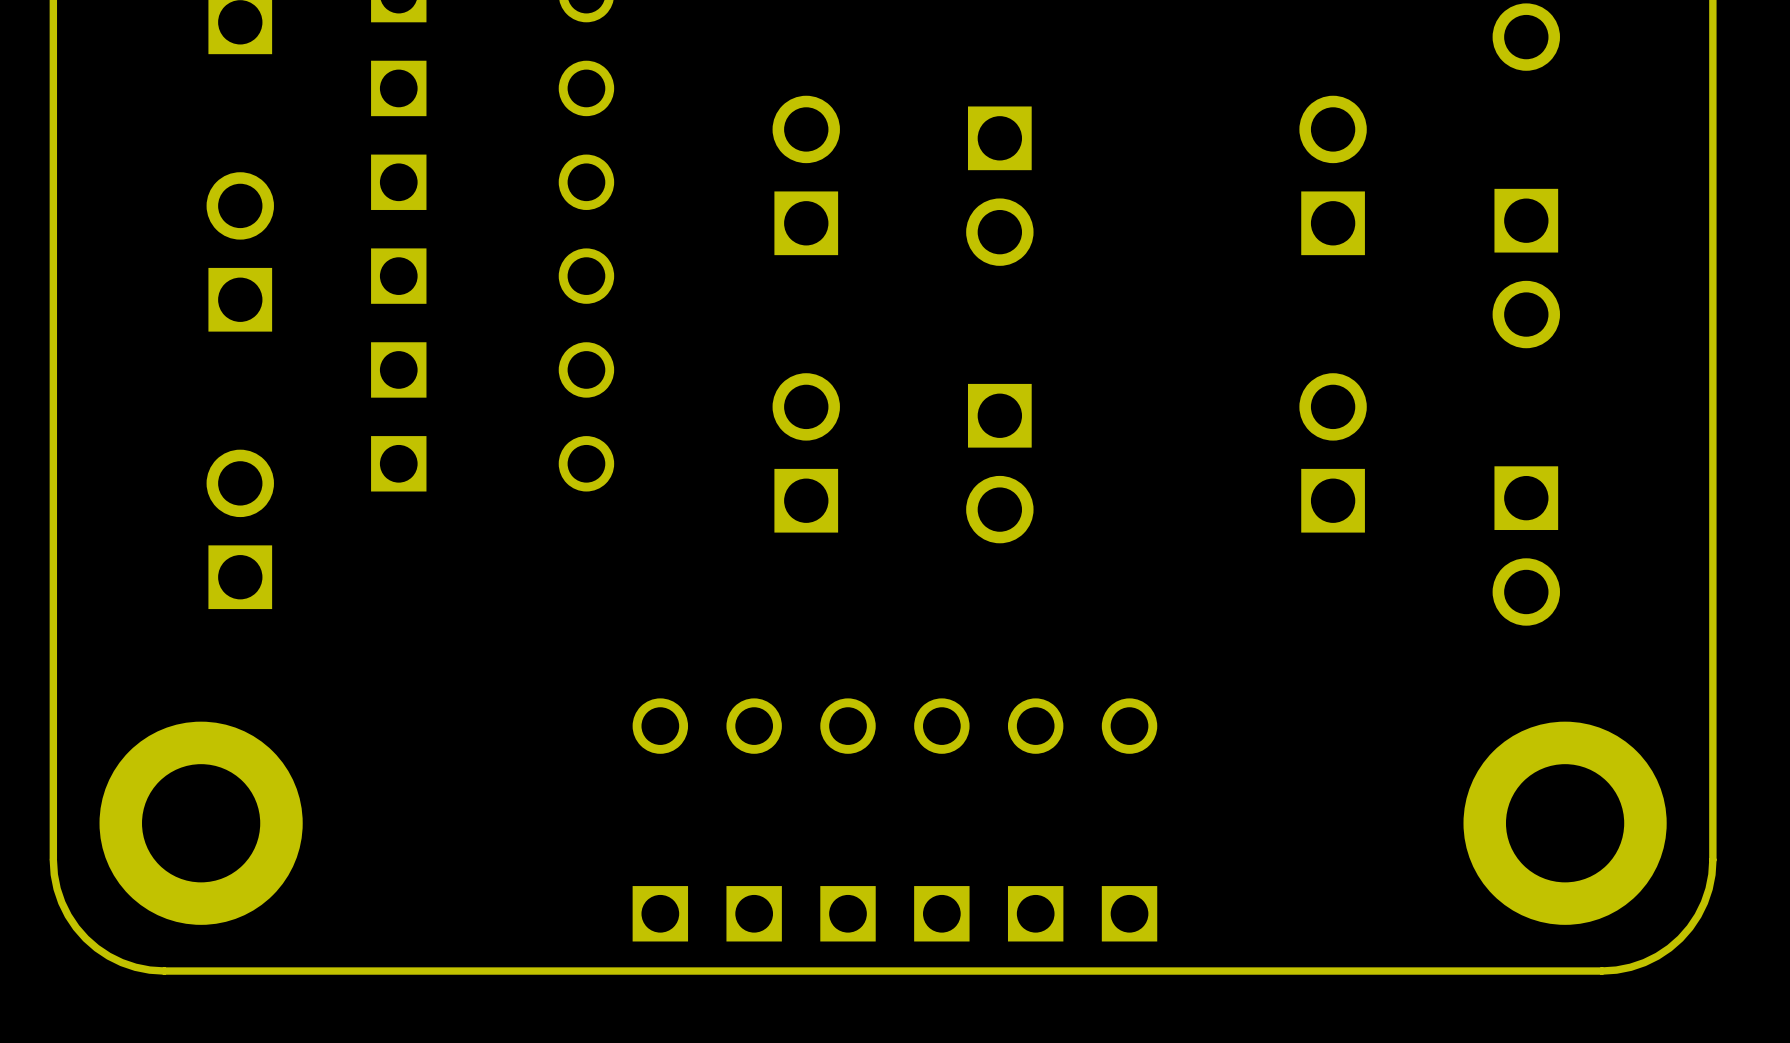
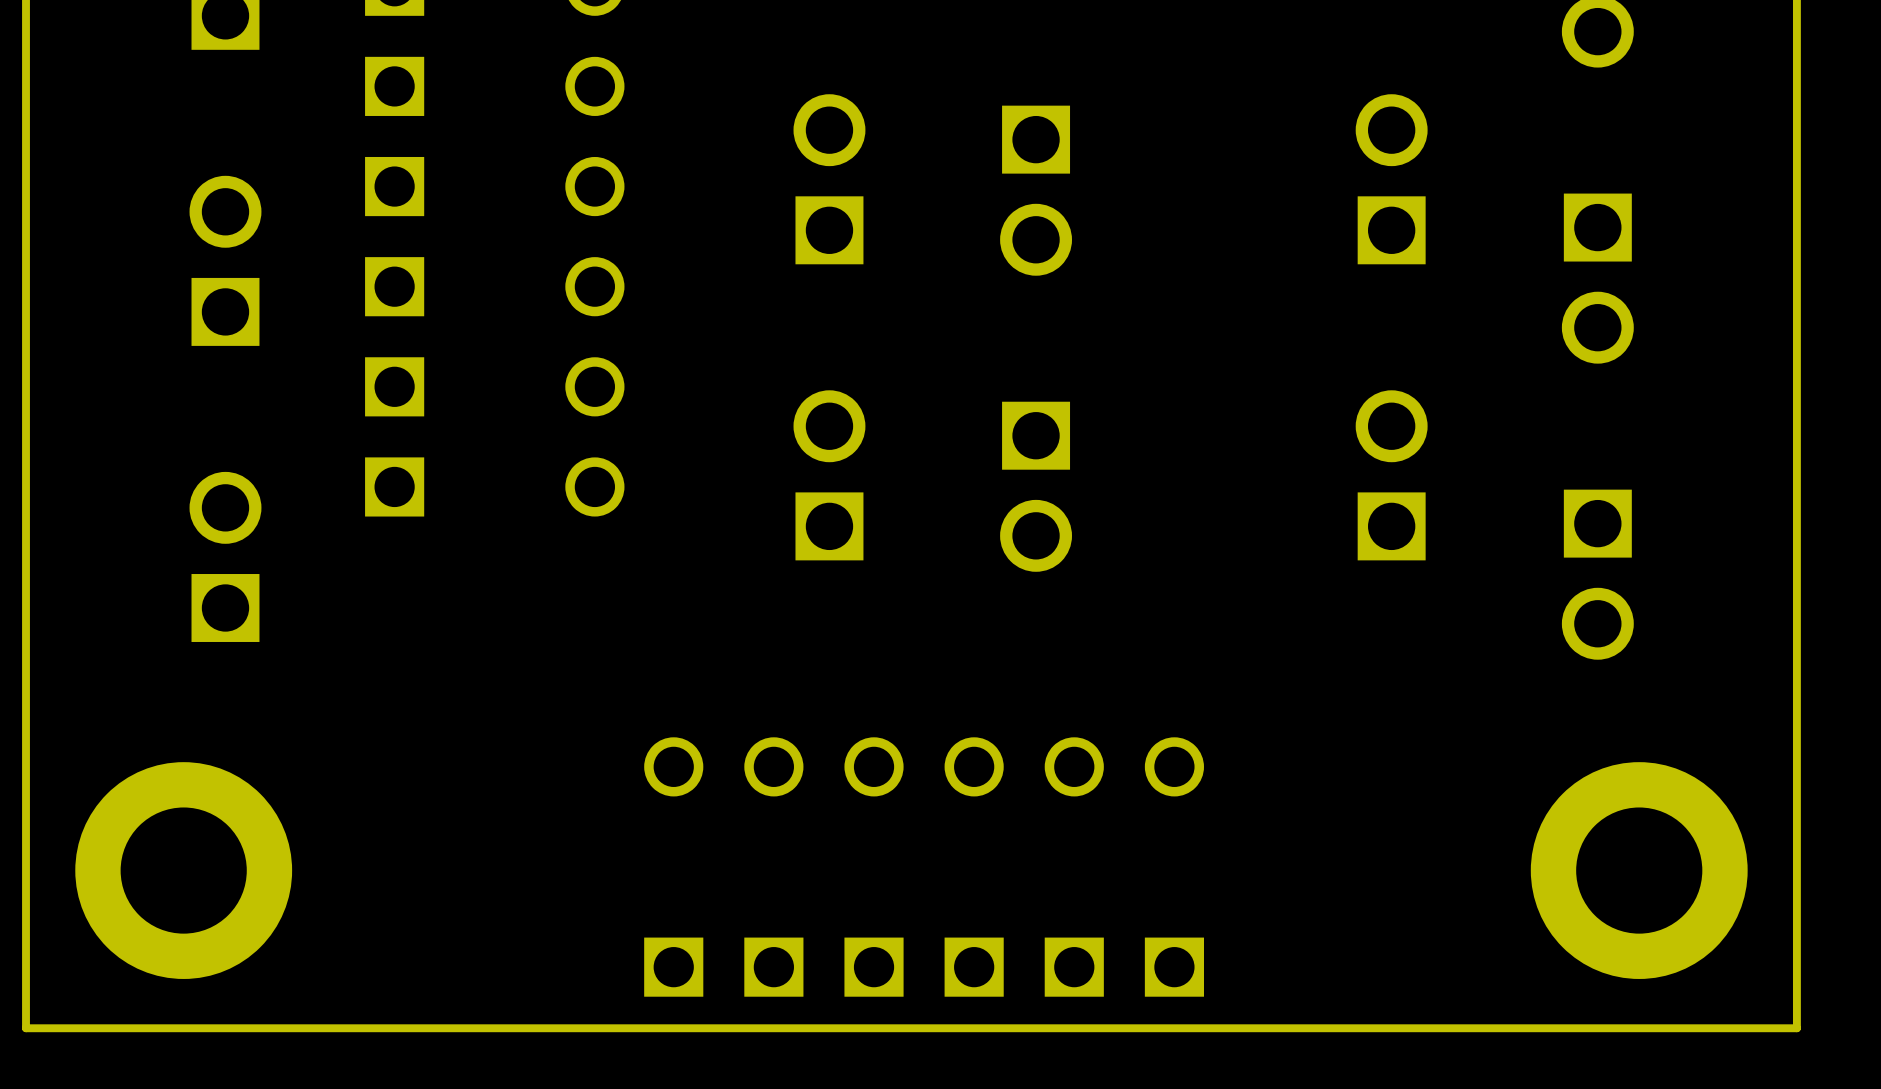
board edge: (53, 860) (57, 888) (61, 902) (76, 927) (85, 938) (96, 948) (121, 962) (149, 970) (164, 971) -> (26, 908) (26, 1028) (144, 1028)
board edge: (1712, 860) (1711, 874) (1704, 902) (1689, 927) (1680, 938) (1669, 948) (1644, 962) (1616, 970) (1602, 971) -> (1796, 909) (1796, 1028) (1678, 1028)

